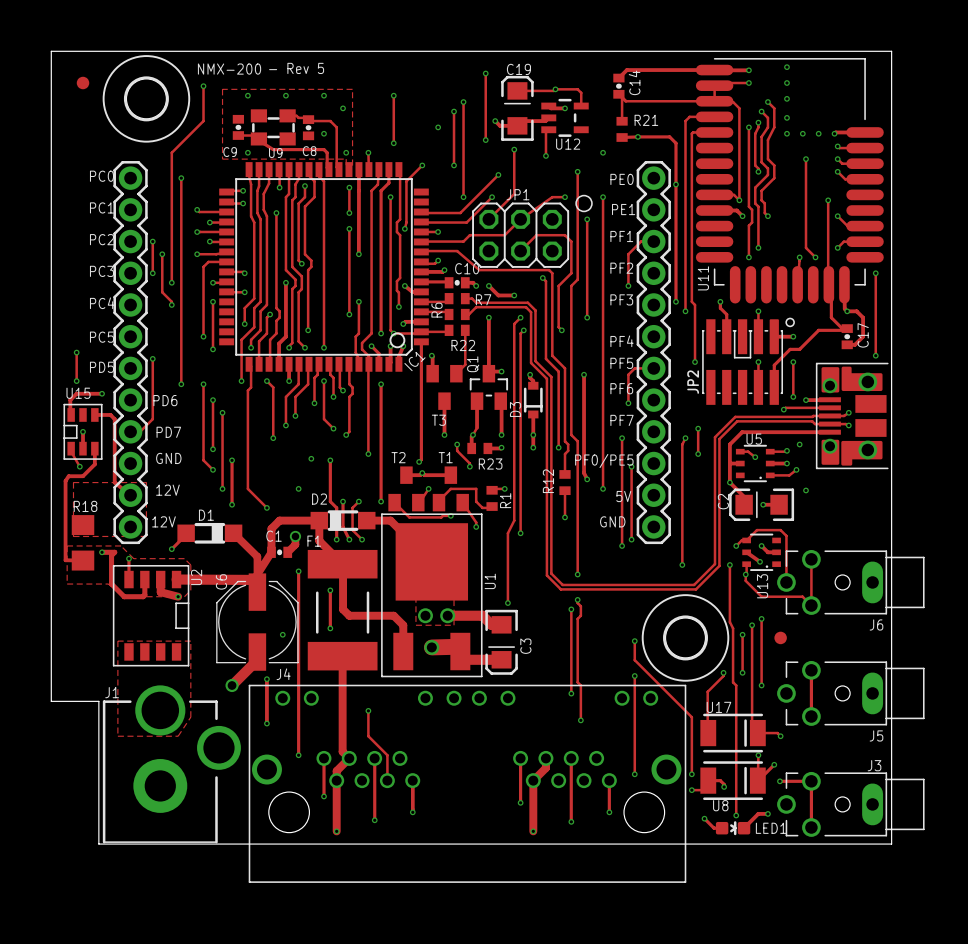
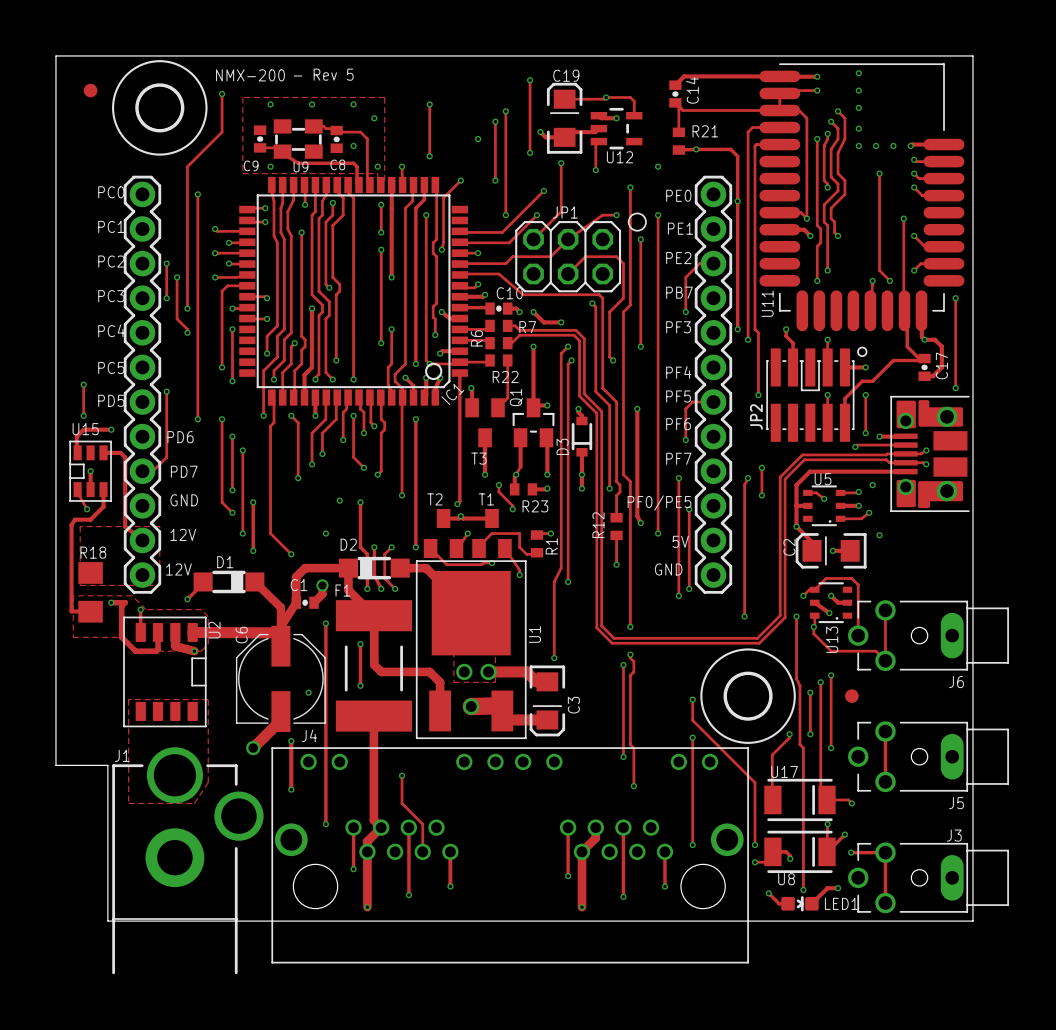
text: PF1 (621, 236) -> PE2 (678, 258)
text: PF2 (621, 268) -> PB7 (679, 292)
J1 footprint: [102, 685, 241, 844] -> [112, 747, 264, 975]

